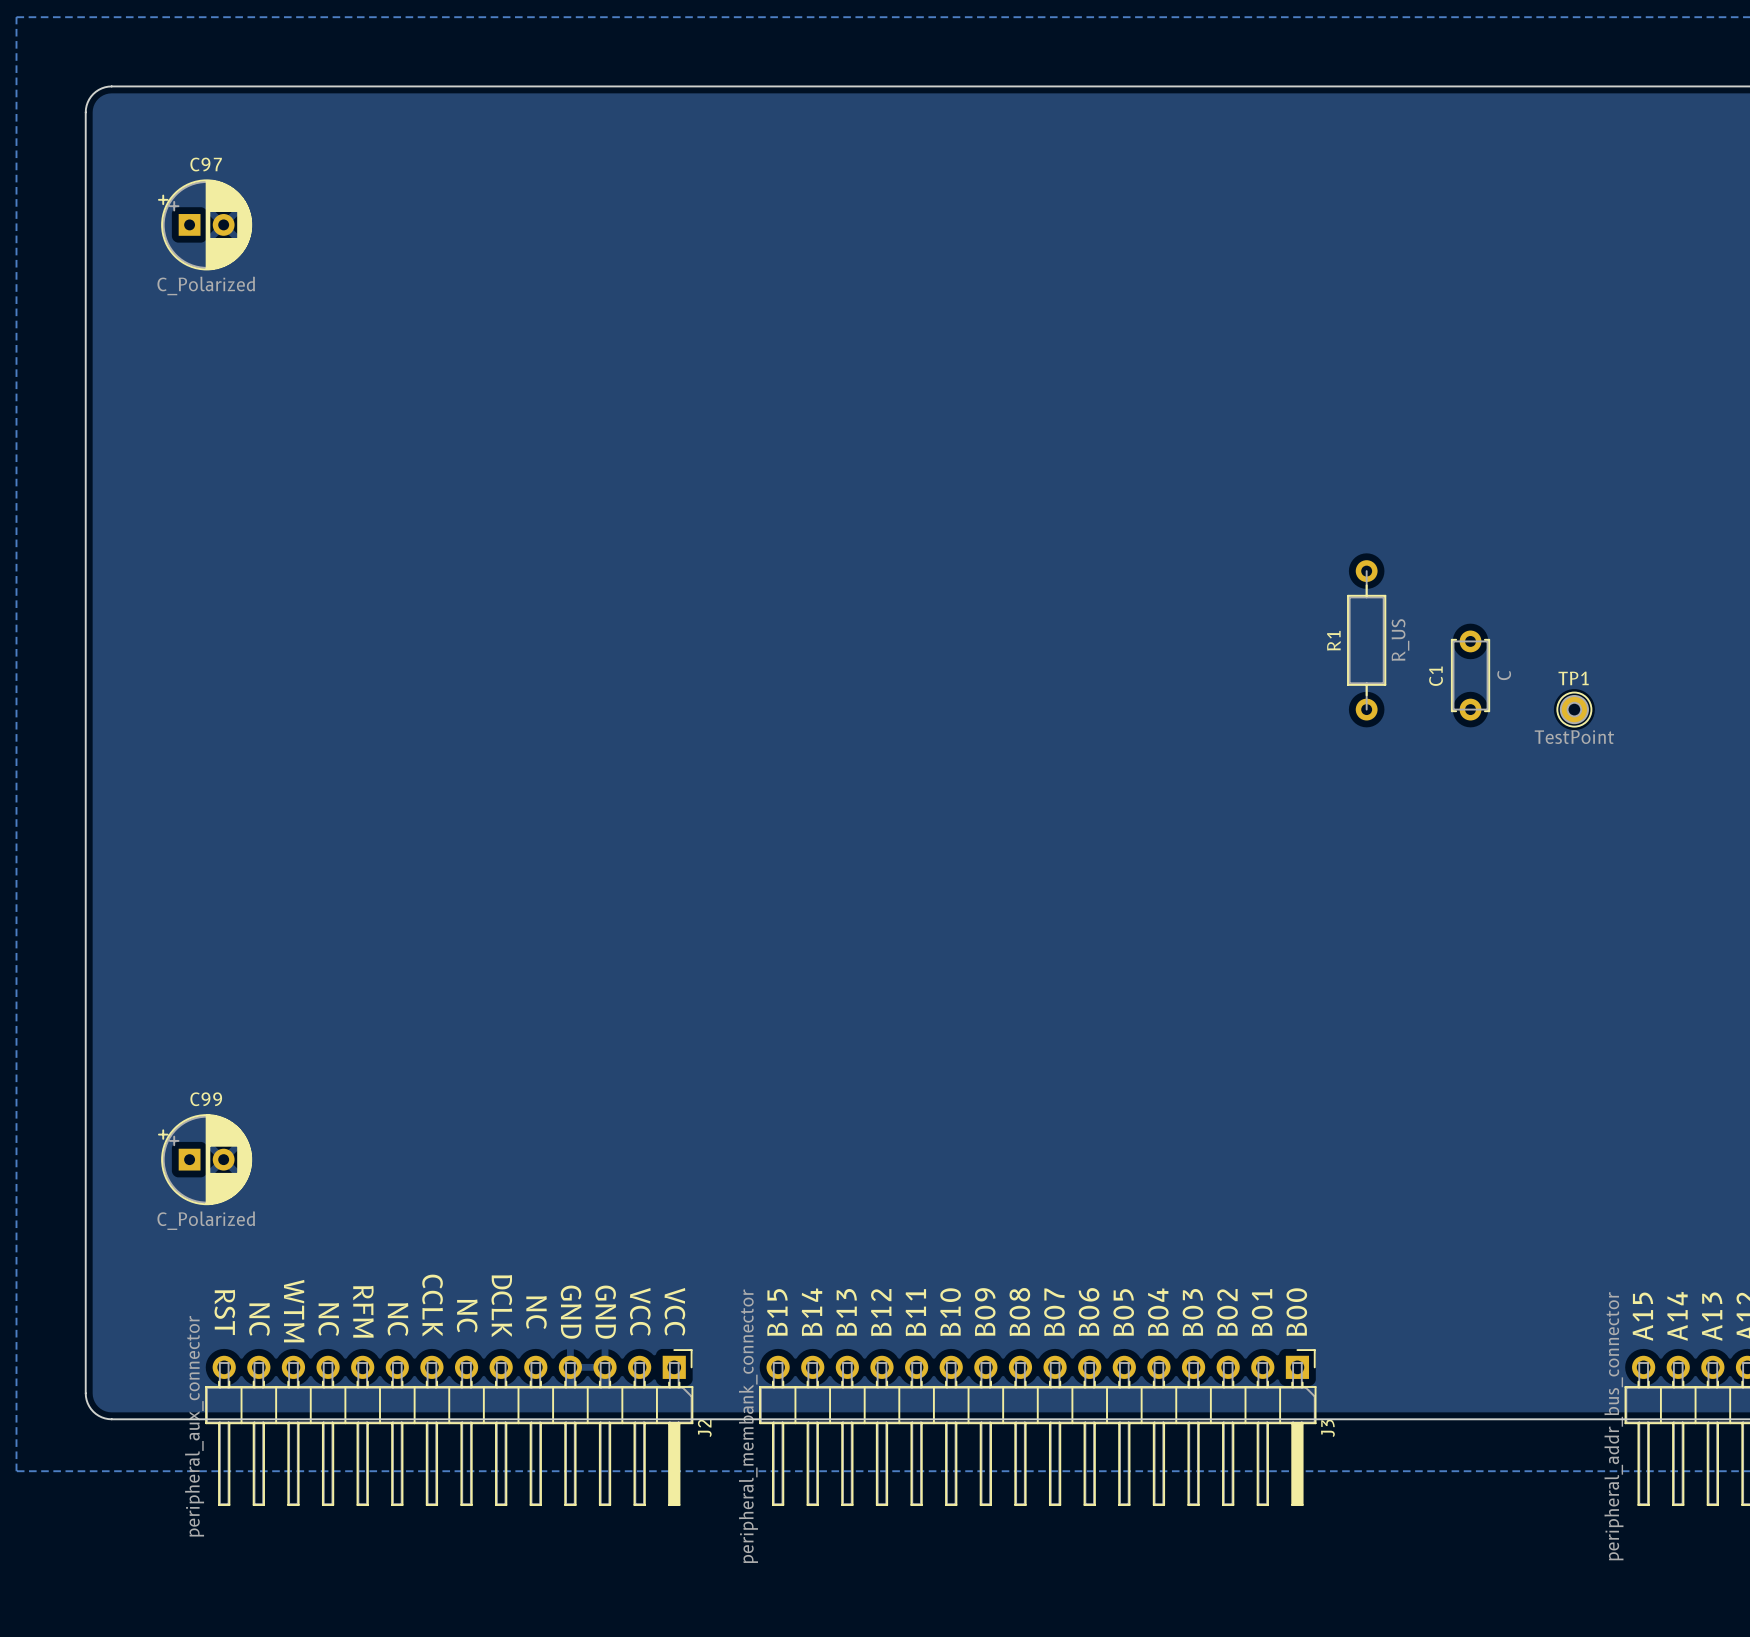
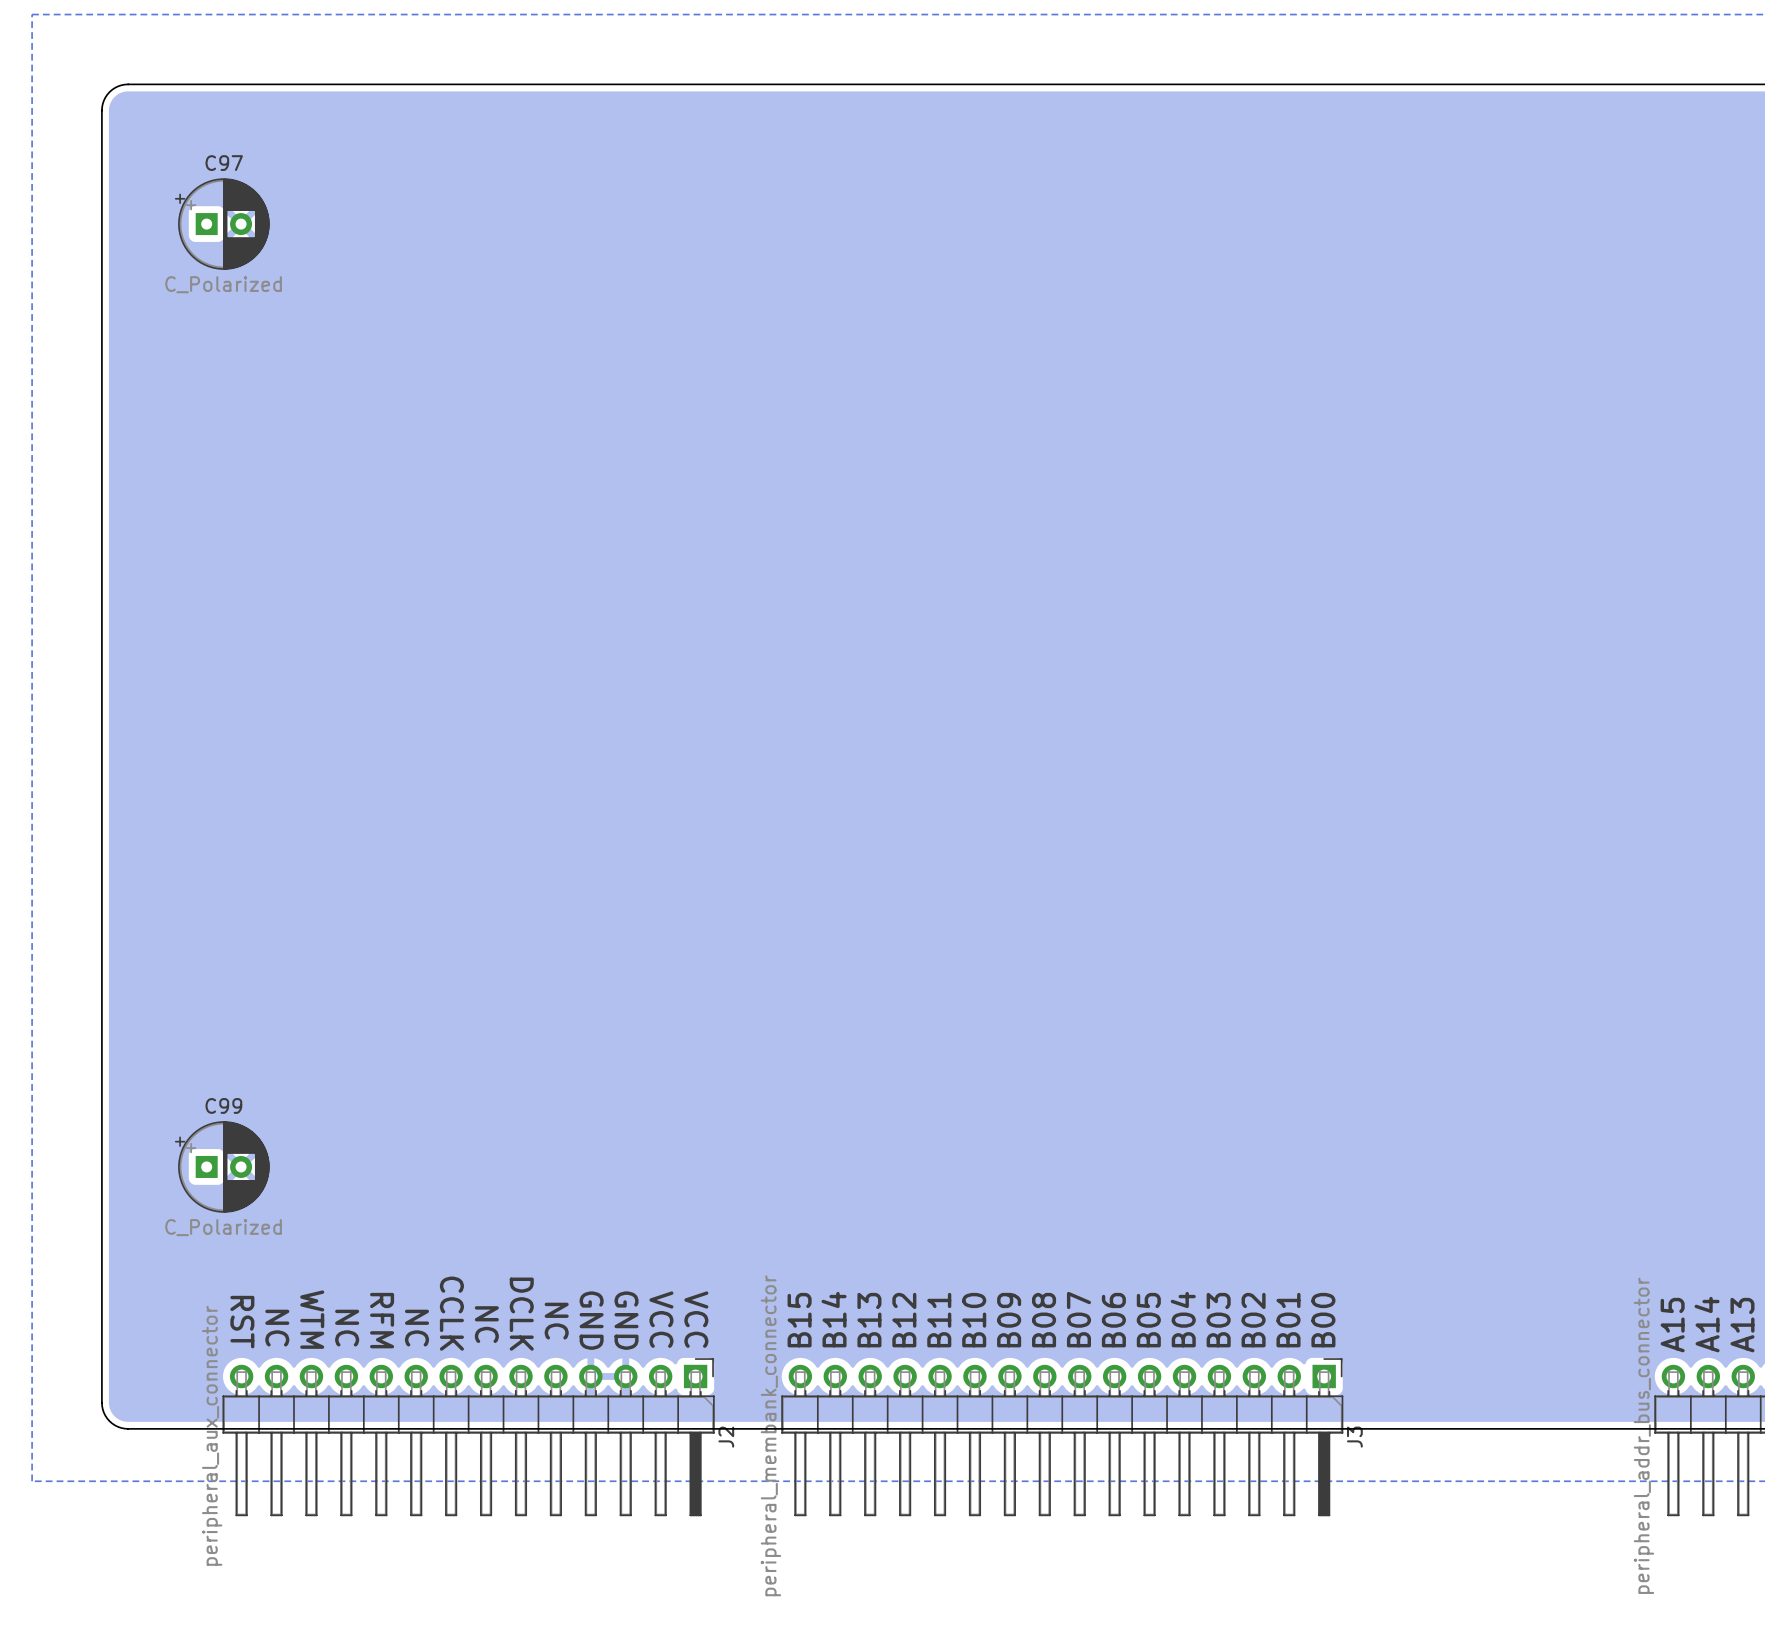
R1: R_US (1366, 640) -> none
C1: C (1470, 675) -> none
TP1: TestPoint (1574, 709) -> none

